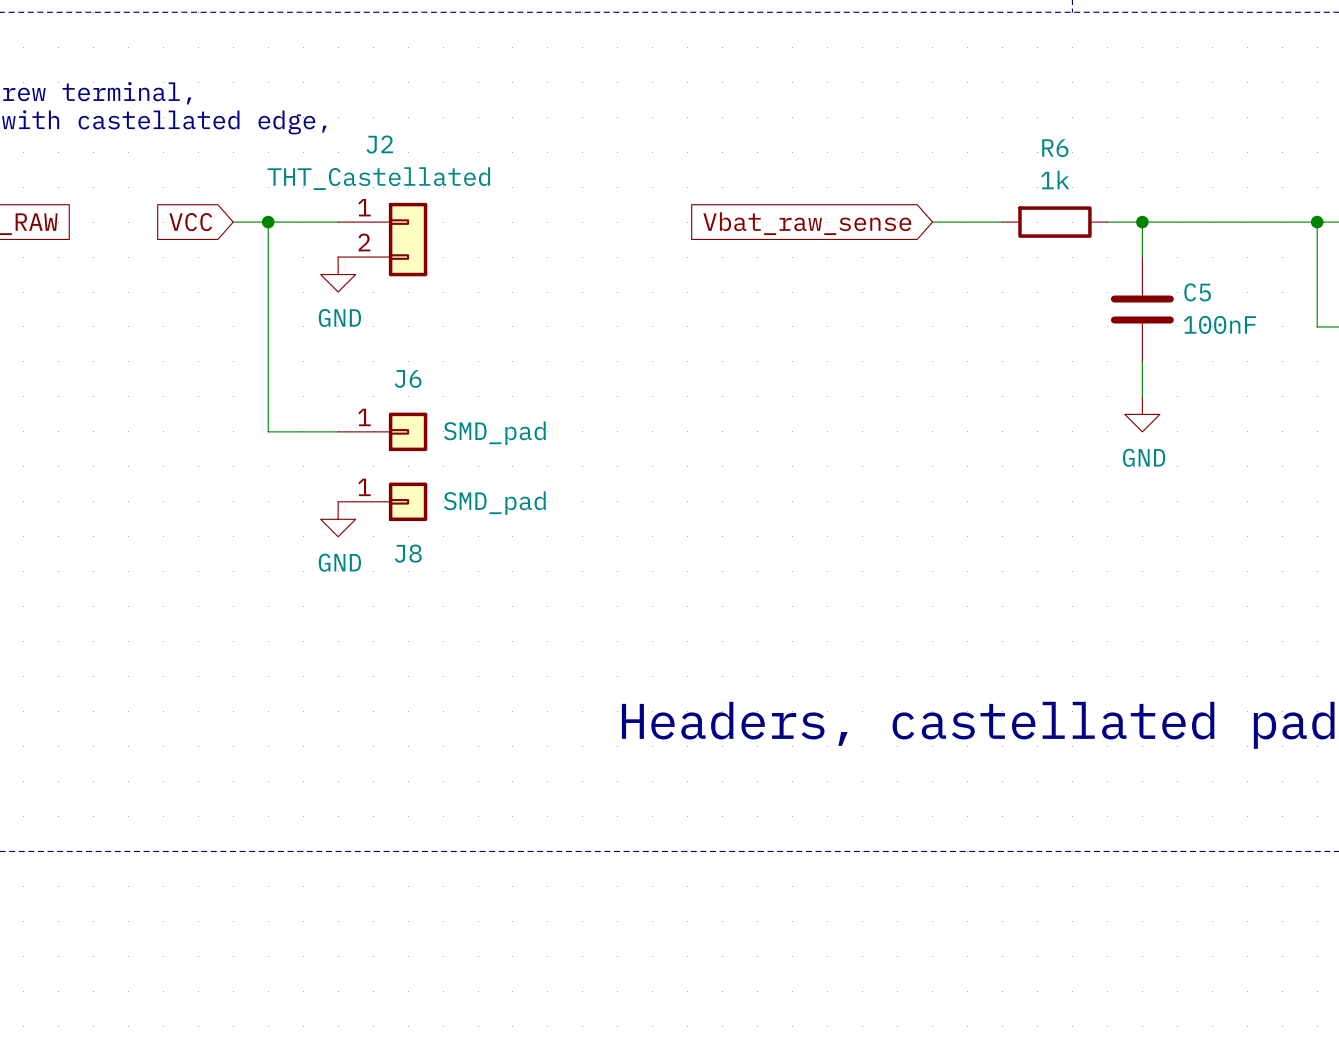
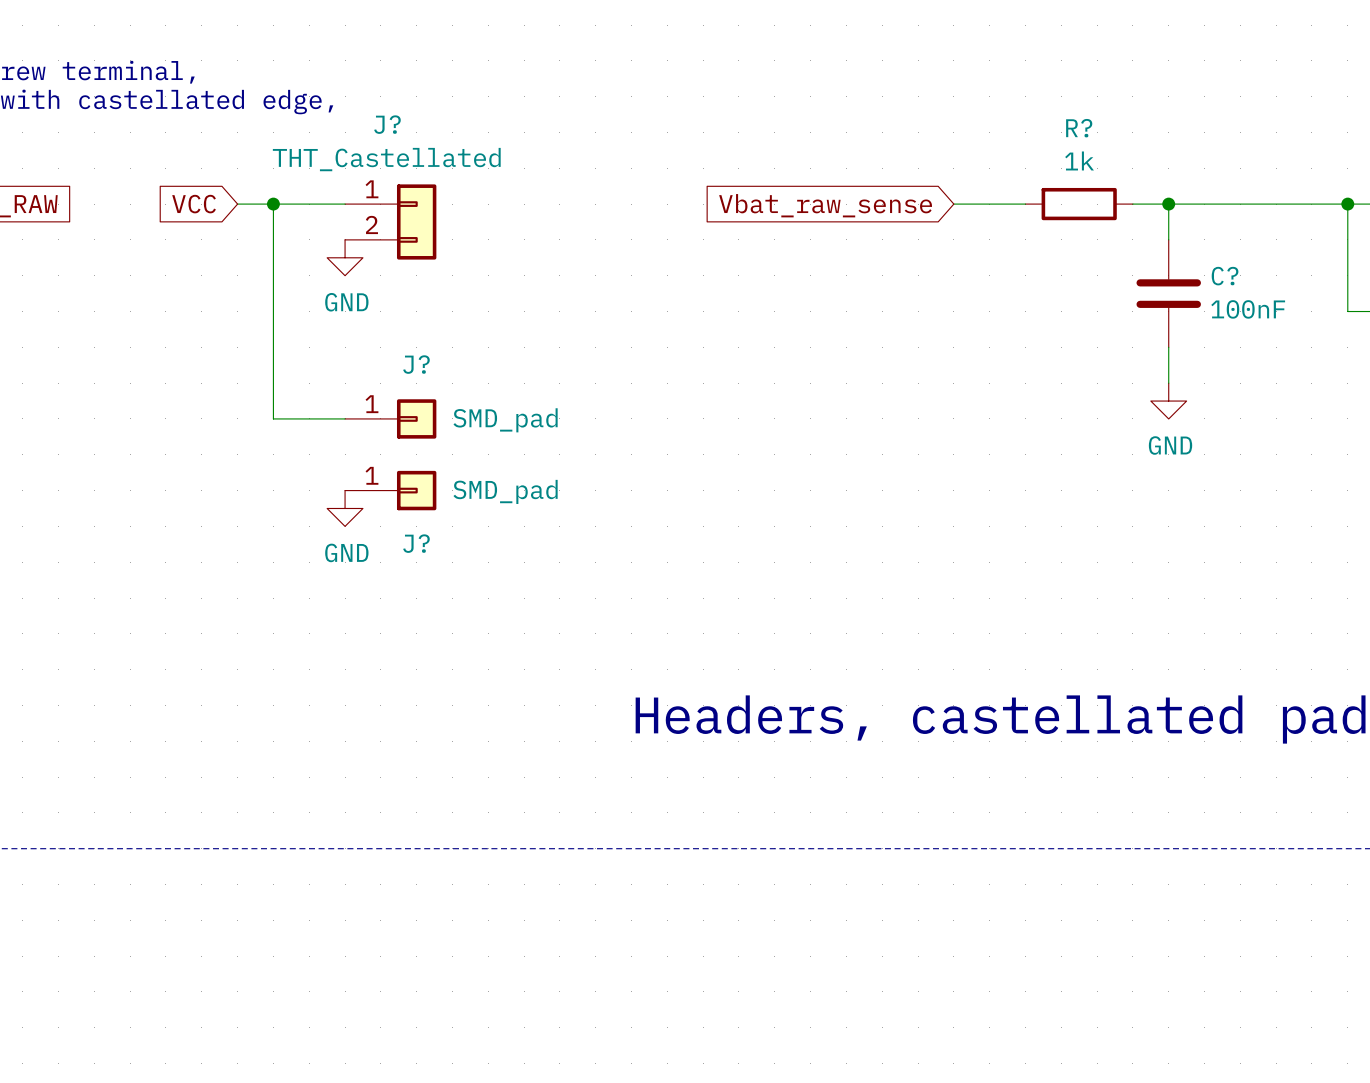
J2 name: J2 (379, 144) -> J? (387, 124)
R6 name: R6 (1055, 148) -> R? (1079, 128)
C5 name: C5 (1197, 292) -> C? (1225, 276)
J6 name: J6 (408, 378) -> J? (416, 364)
J8 name: J8 (408, 553) -> J? (416, 543)

